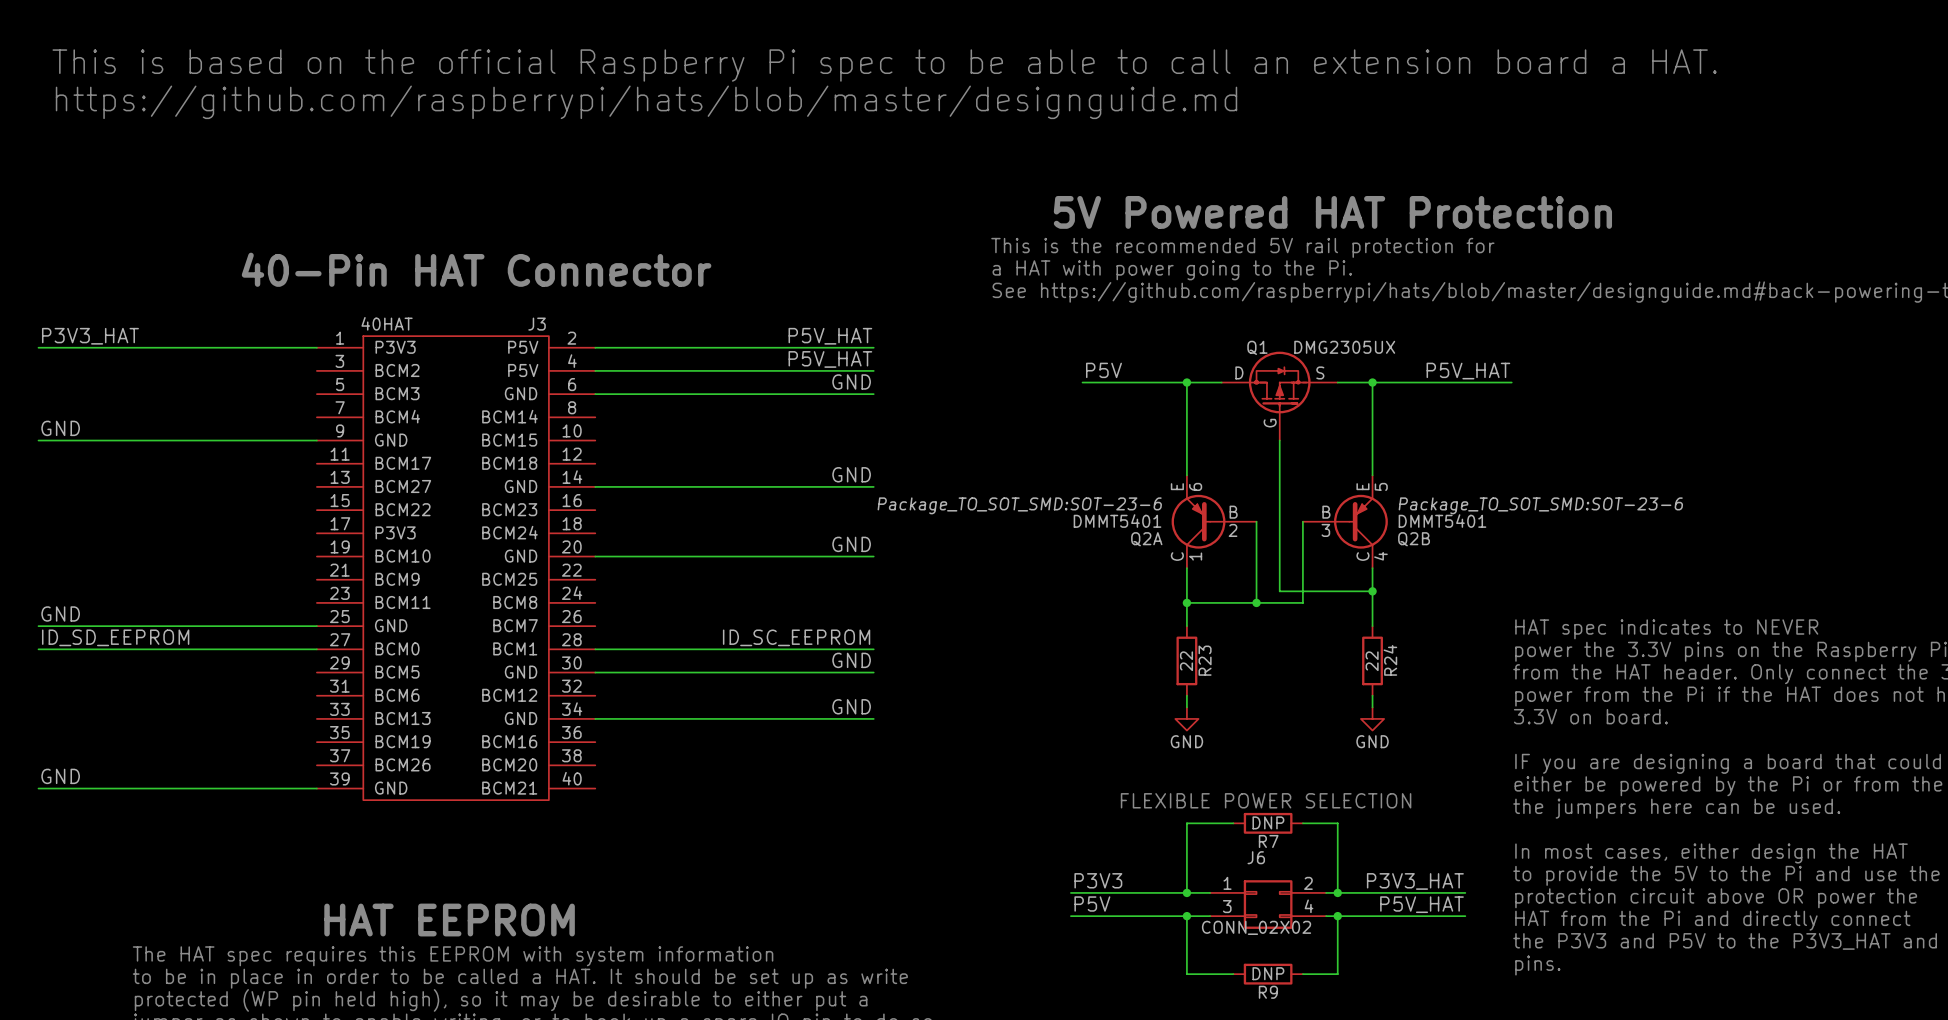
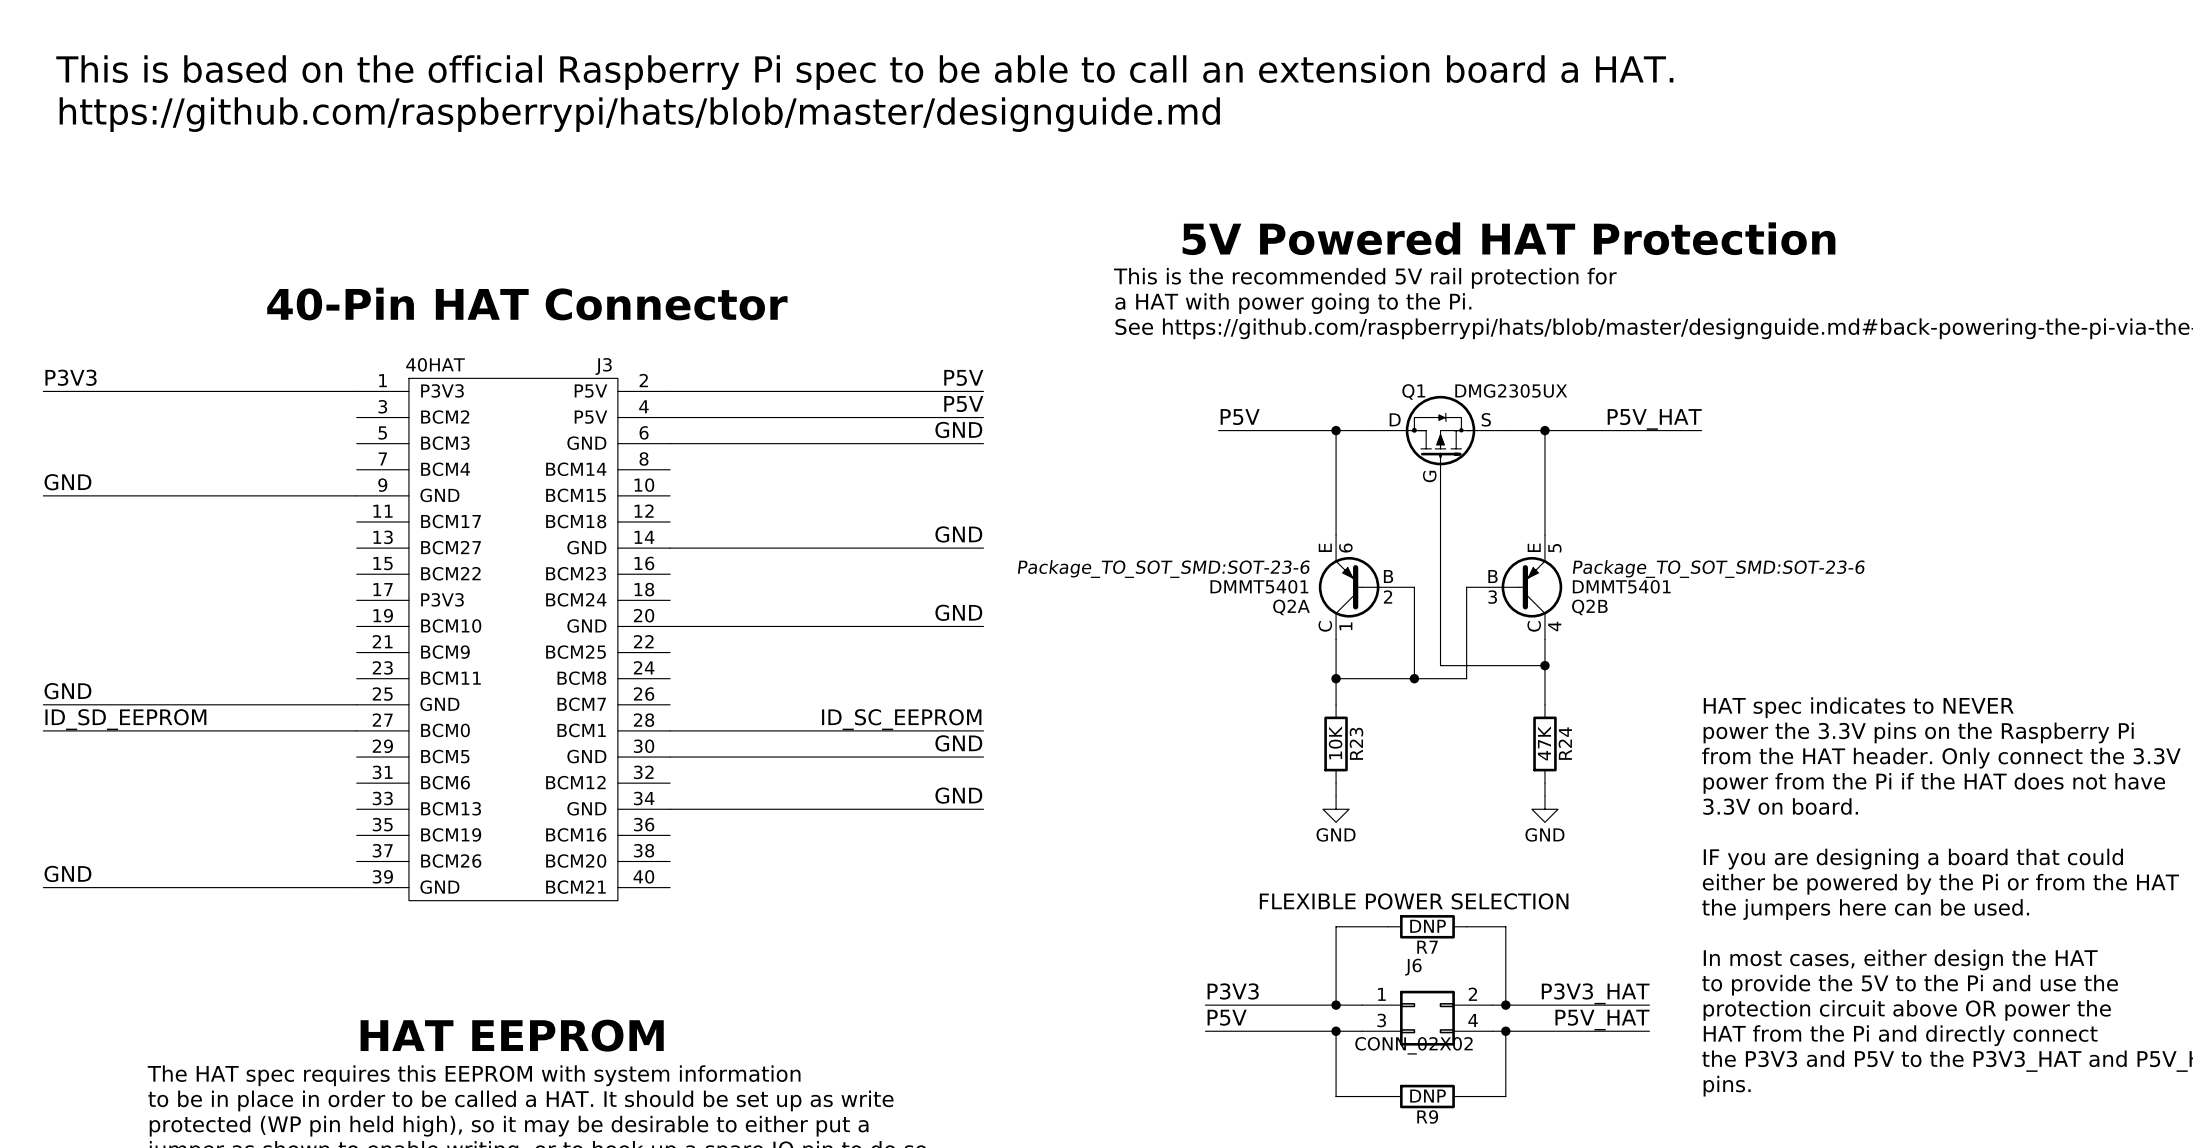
label: P3V3_HAT (90, 336) -> P3V3 (71, 377)
label: P5V_HAT (830, 336) -> P5V (963, 377)
label: P5V_HAT (830, 359) -> P5V (963, 404)
R23 value: 22 (1186, 661) -> 10K (1335, 742)
R24 value: 22 (1372, 661) -> 47K (1544, 743)

